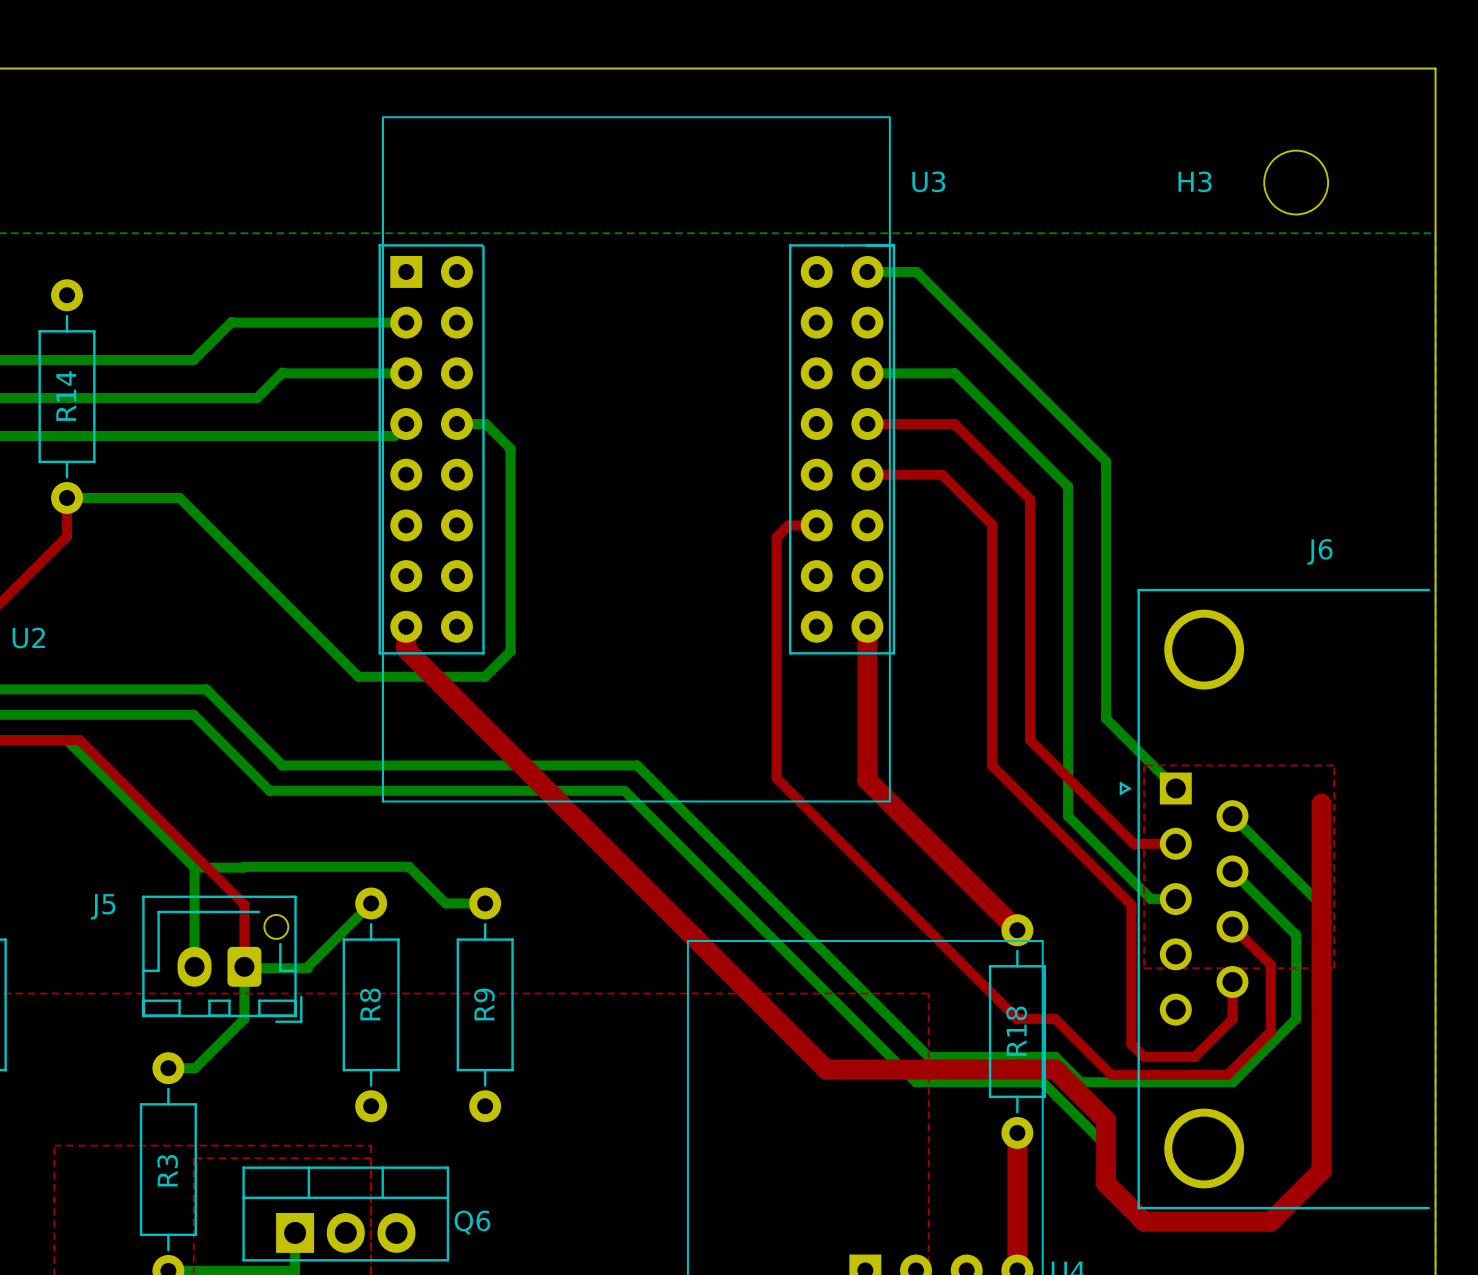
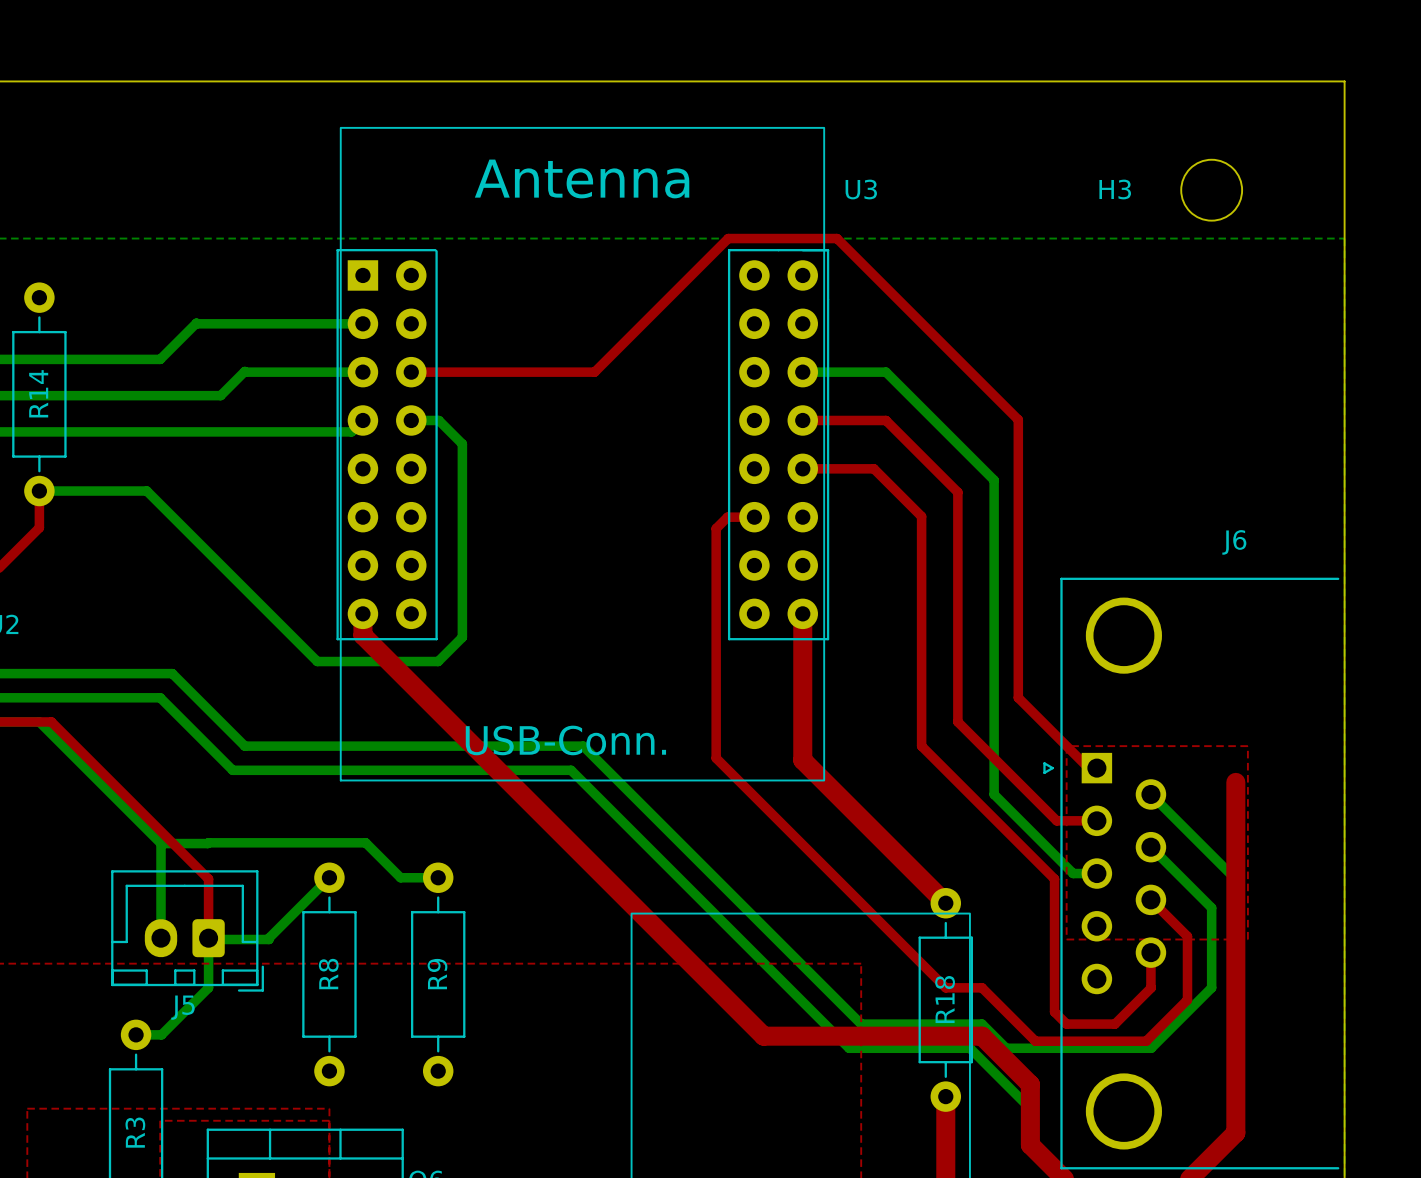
text: none -> Antenna (582, 178)
bottom track: (867, 271) (916, 271) (1106, 461) (1106, 718) (1175, 788) -> none
top track: none -> (411, 372) (594, 372) (728, 238) (837, 238) (1018, 419) (1018, 697) (1088, 768) (1096, 768)
text: none -> USB-Conn. (565, 740)
J5 footprint: [142, 895, 303, 1023] -> [111, 870, 264, 992]
J5 name position: J5 (103, 906) -> J5 (182, 1007)

